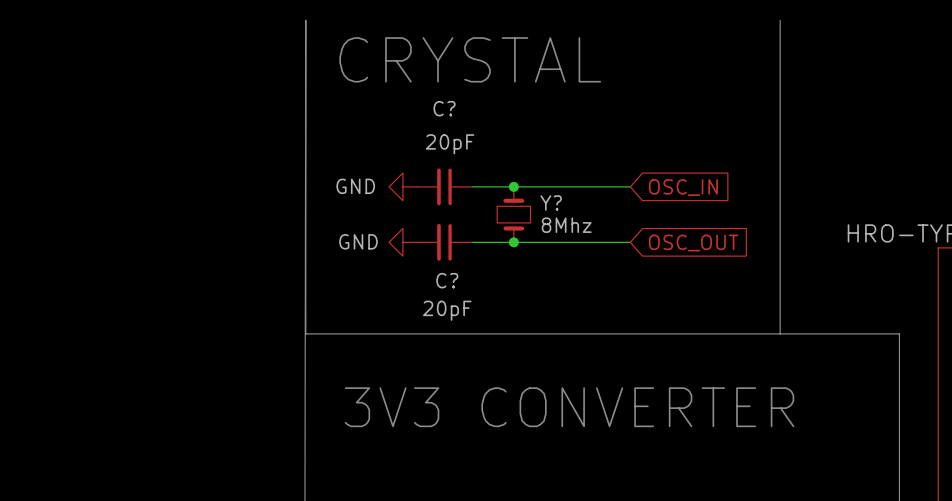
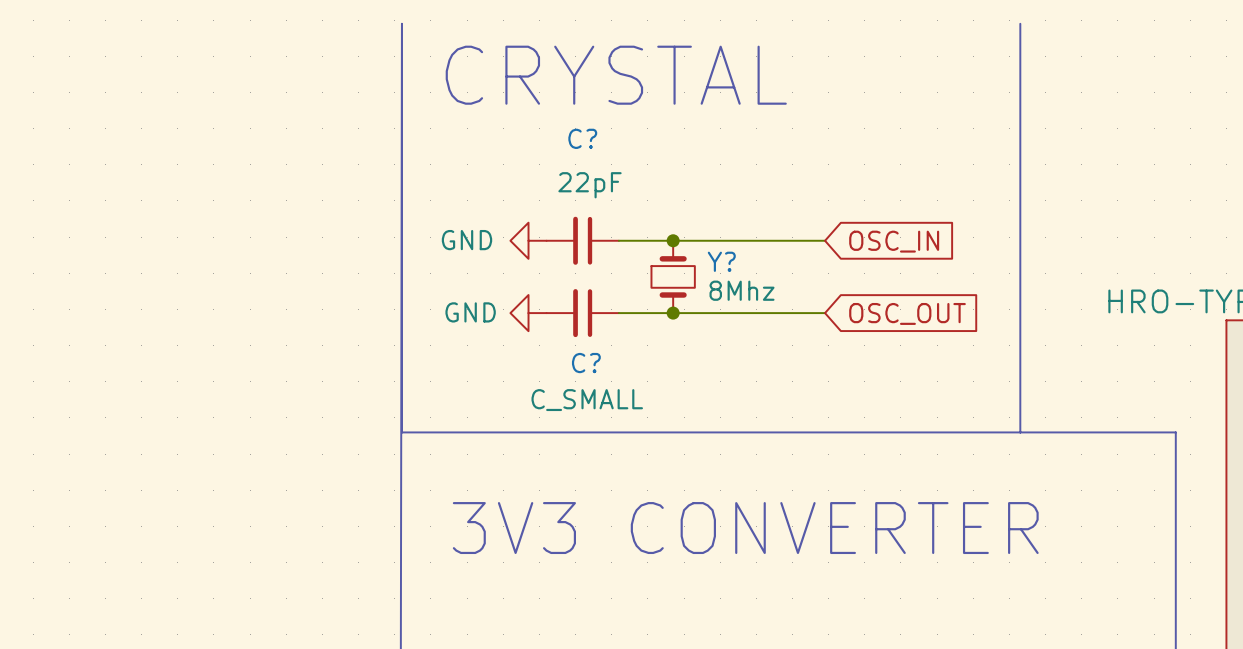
C? value: 20pF (450, 144) -> 22pF (589, 185)
C? value: 20pF (447, 310) -> C_SMALL (587, 400)

